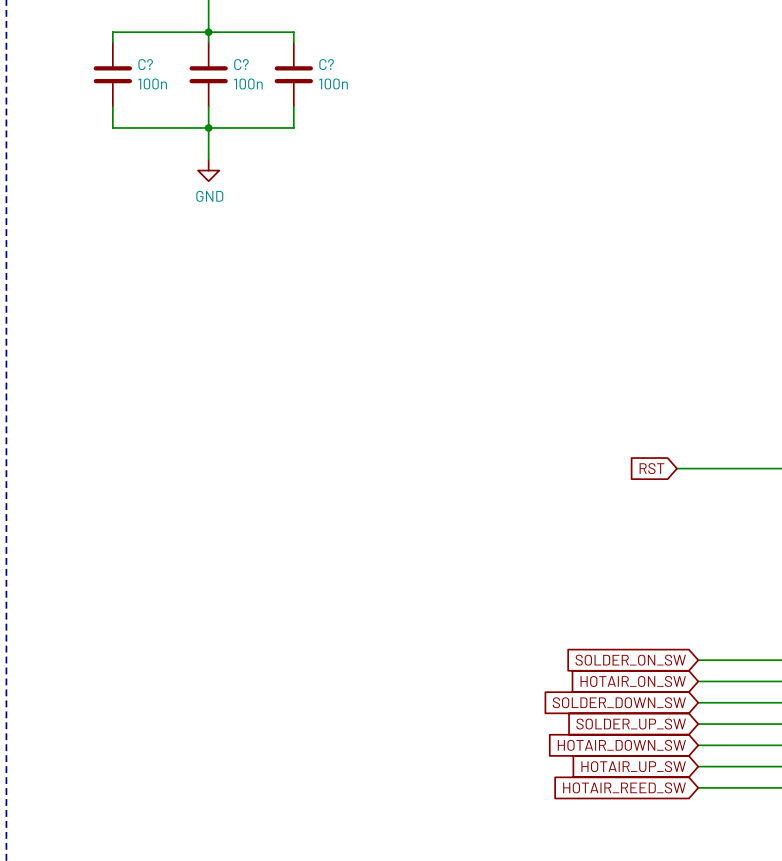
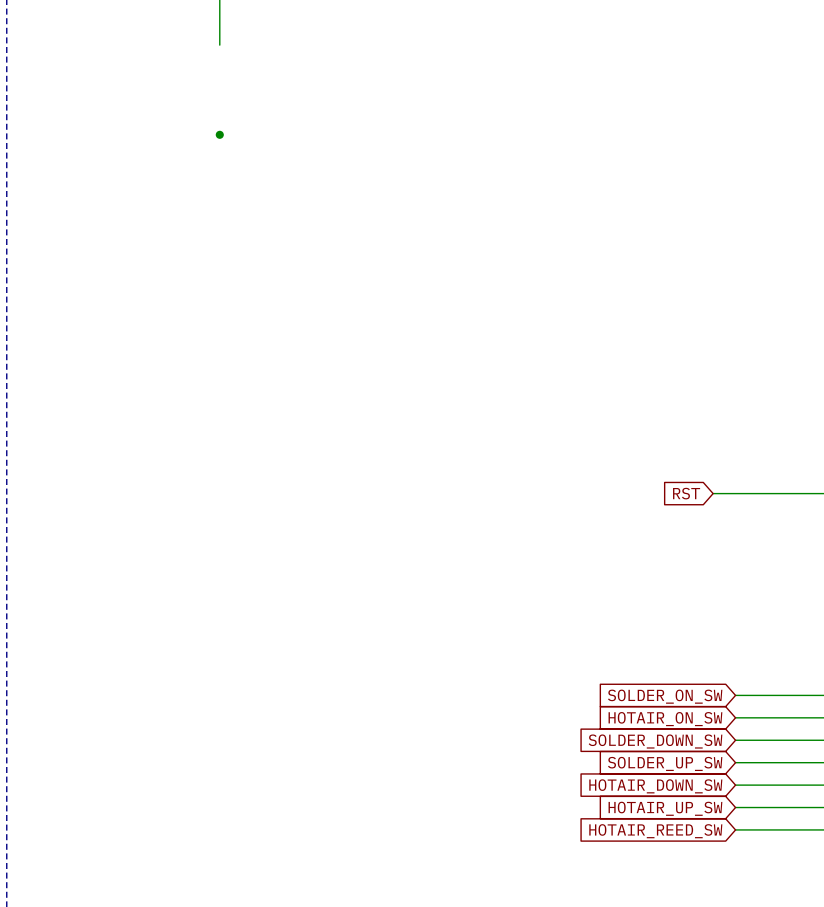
junction: (208, 32) -> none
wire: (112, 42) (112, 32) (293, 32) (293, 42) -> none
C?: 100n (112, 74) -> none
C?: 100n (208, 74) -> none
C?: 100n (293, 74) -> none
wire: (112, 106) (112, 127) (293, 127) (293, 106) -> none
wire: (208, 106) (208, 159) -> none
power symbol: GND (208, 170) -> none

